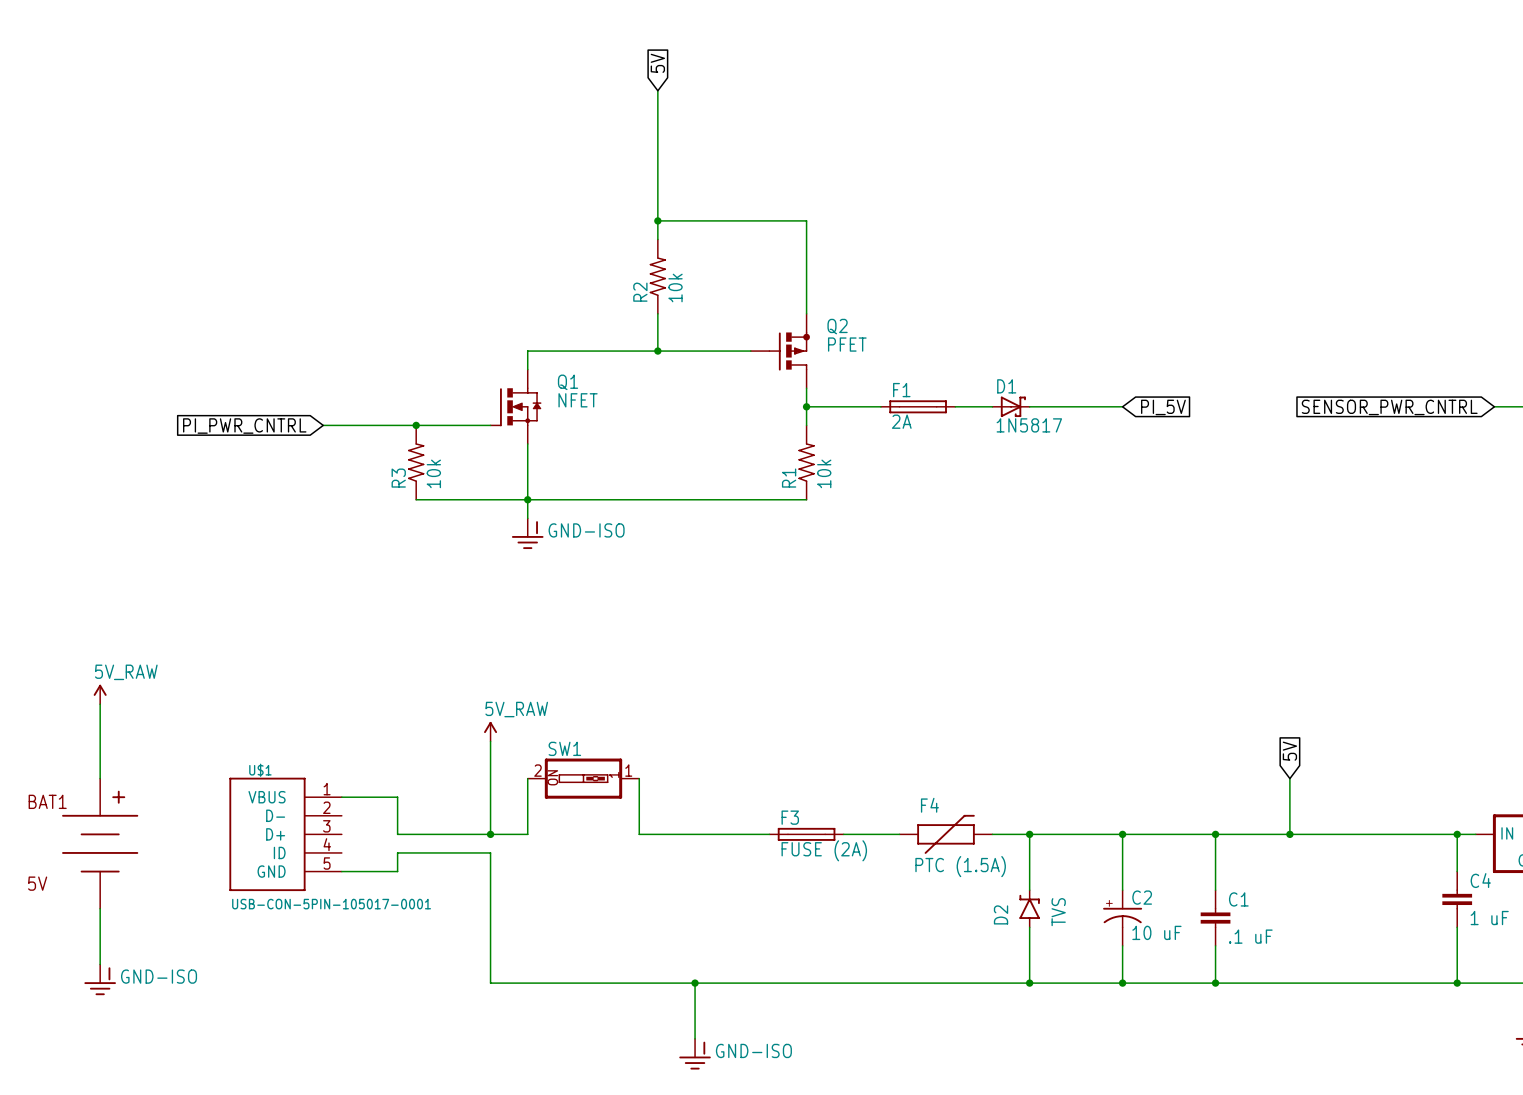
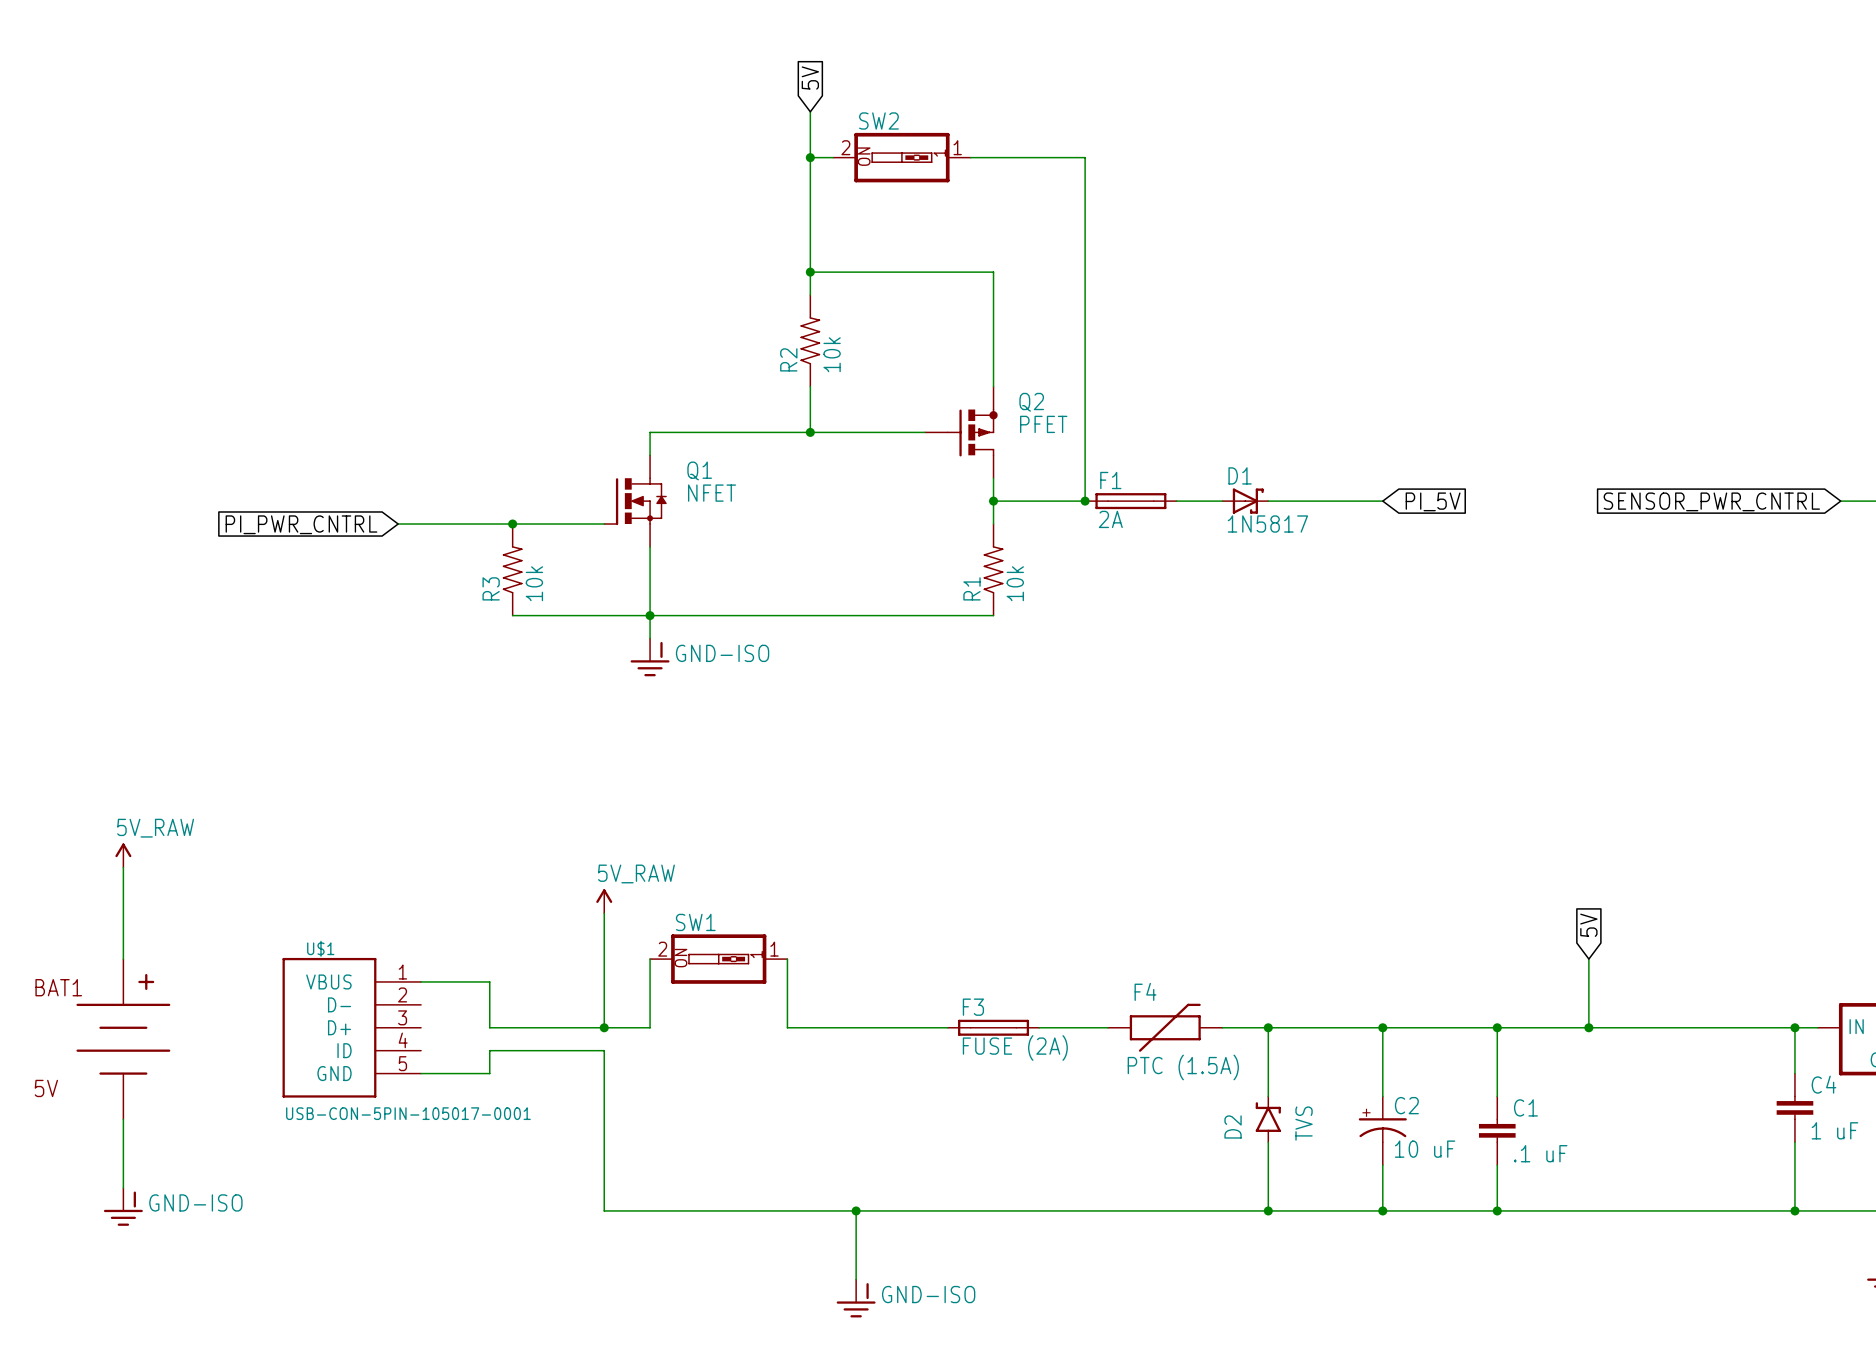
wire: none -> (810, 157) (833, 157)
junction: none -> (810, 157)
SW2: none -> (901, 157)
wire: none -> (970, 157) (1085, 157) (1085, 501)
junction: none -> (1085, 501)

